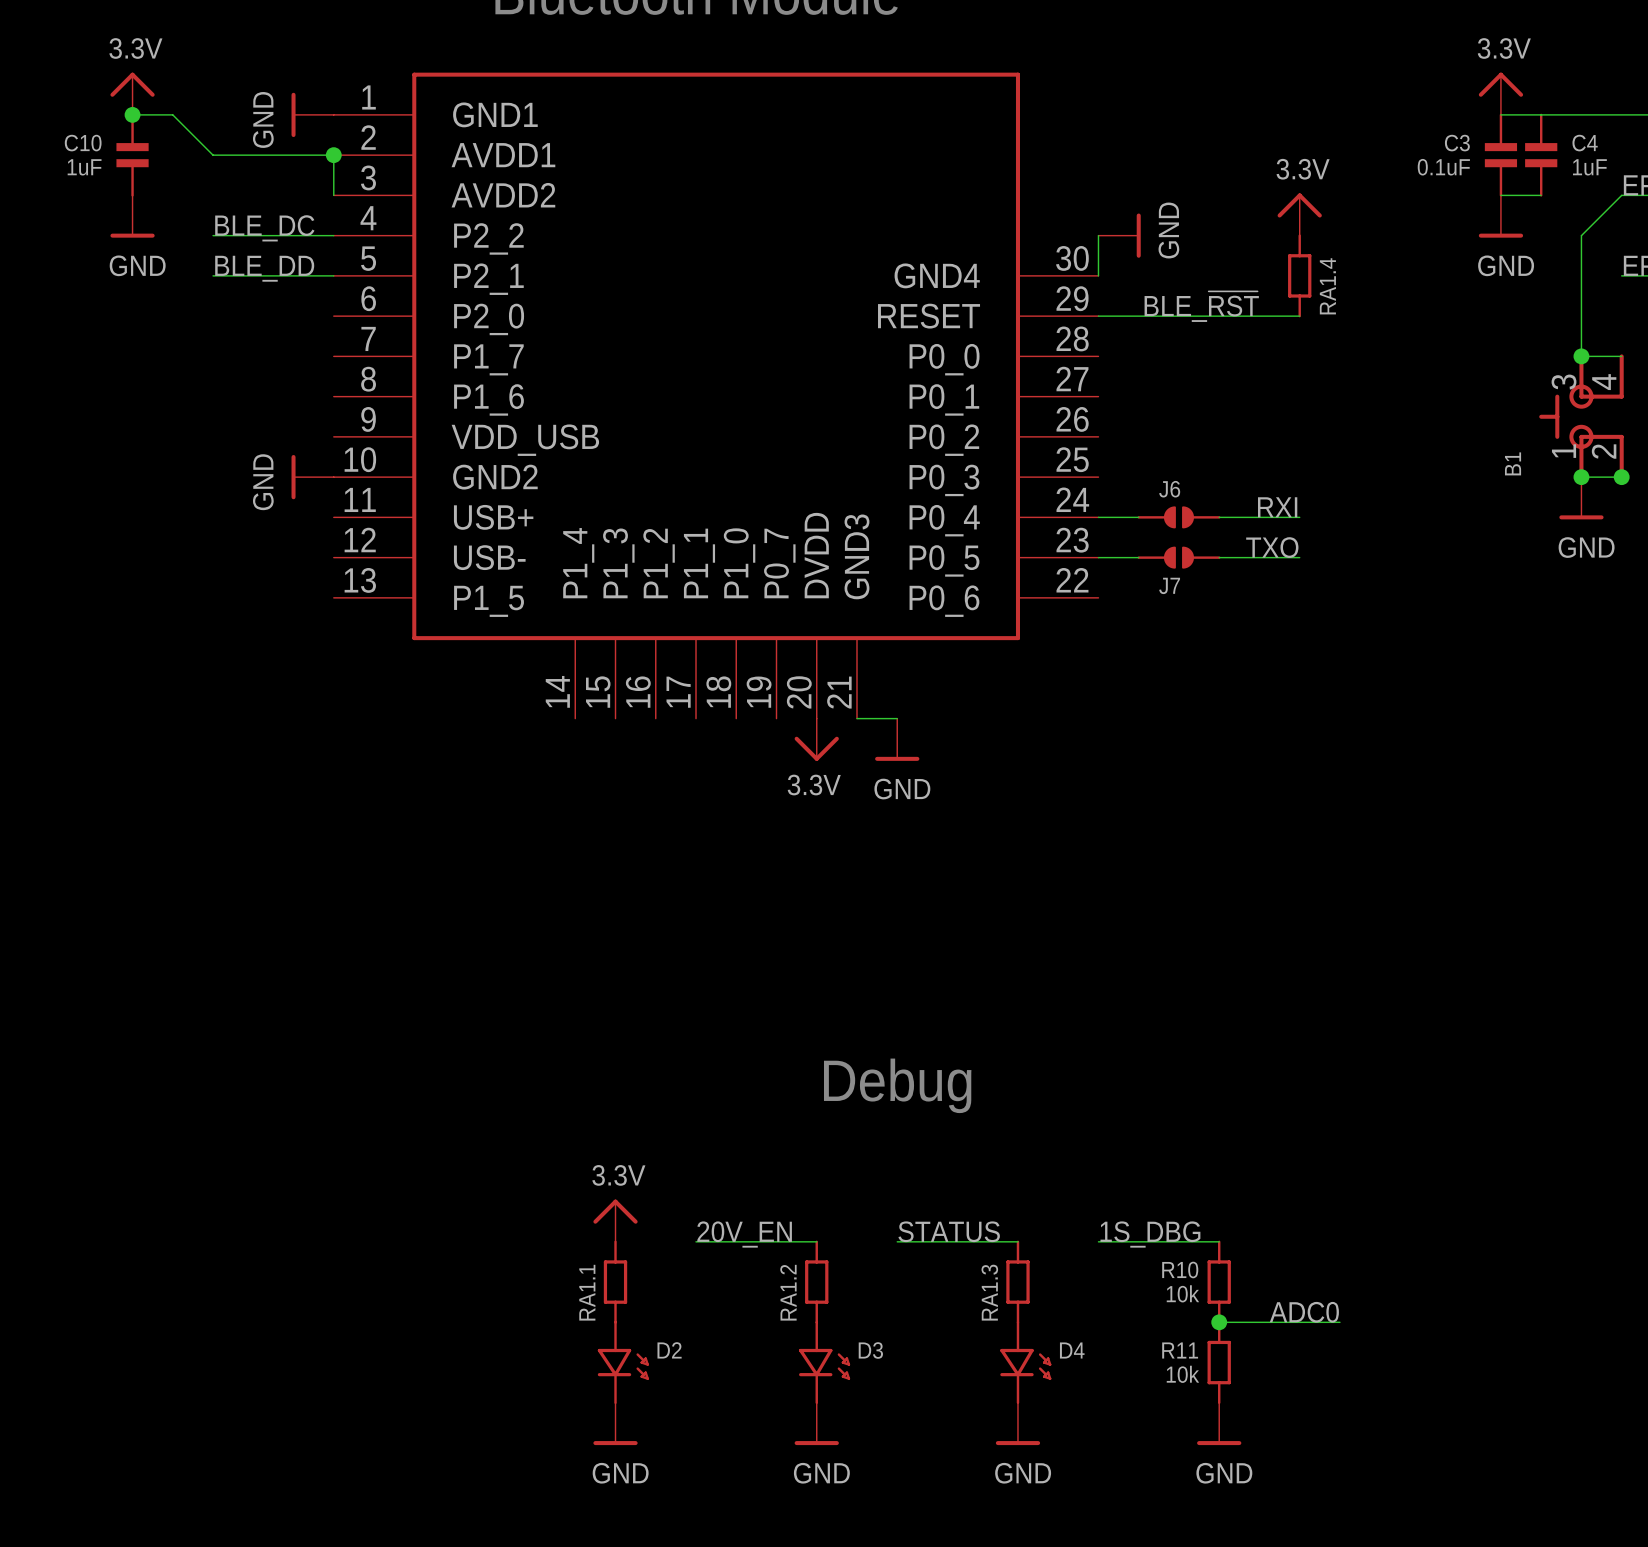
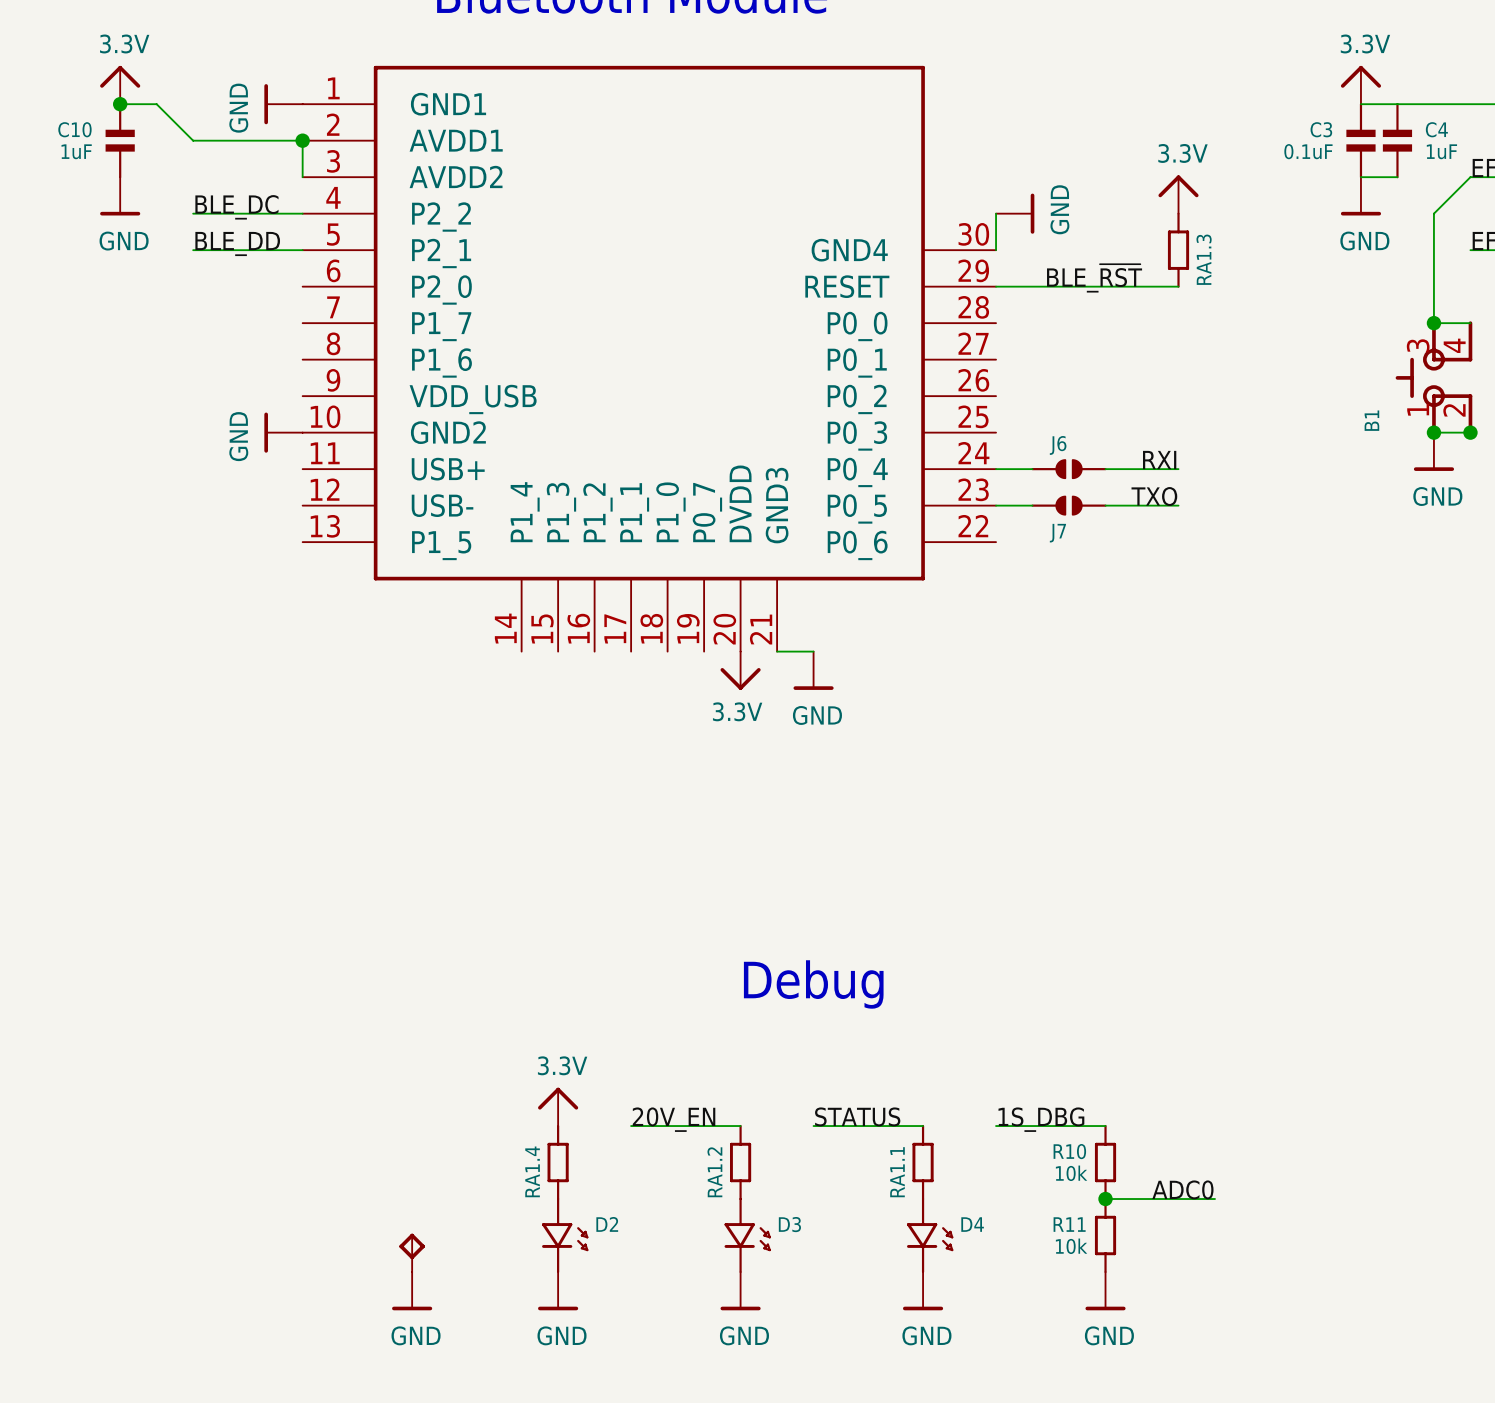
RA1.4 name: RA1.4 (1327, 286) -> RA1.3 (1204, 259)
RA1.1 name: RA1.1 (587, 1292) -> RA1.4 (532, 1171)
RA1.3 name: RA1.3 (989, 1292) -> RA1.1 (897, 1172)
part: none -> (412, 1252)
power symbol: none -> GND (412, 1291)

